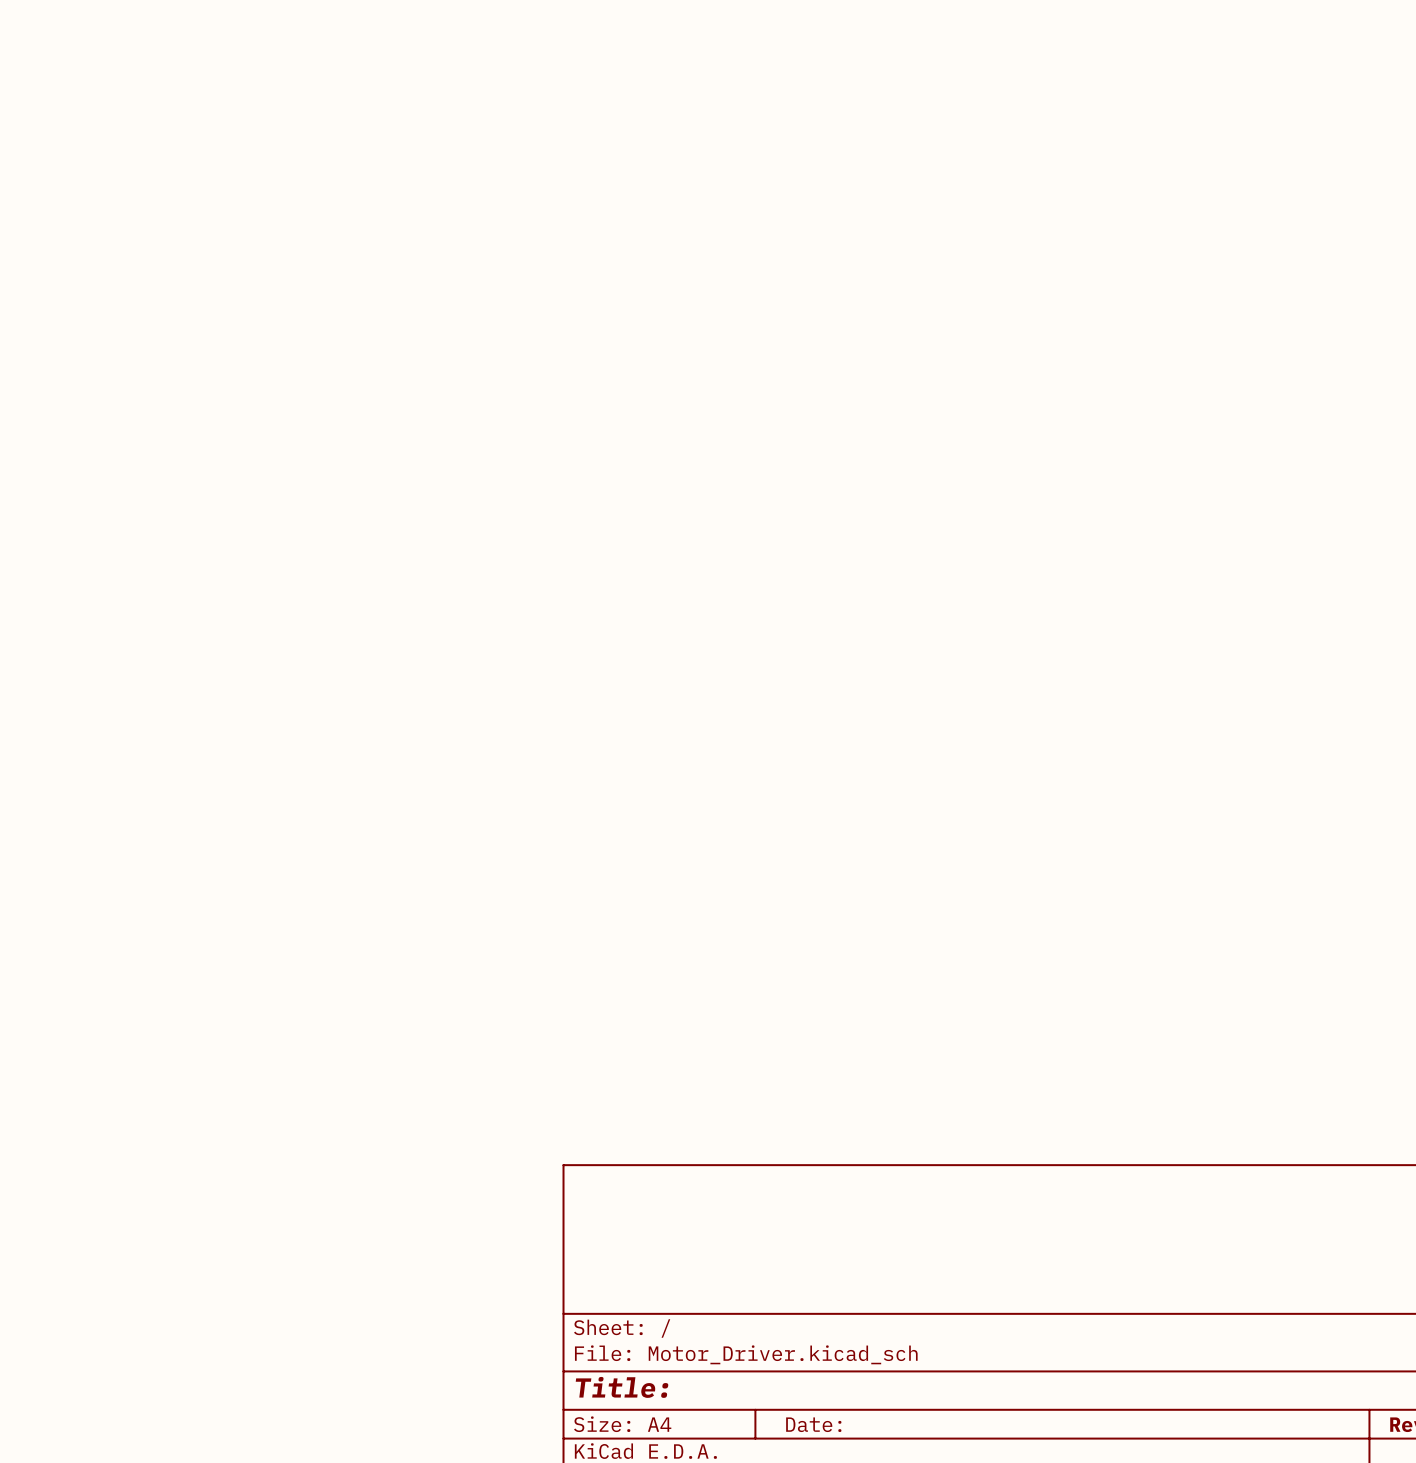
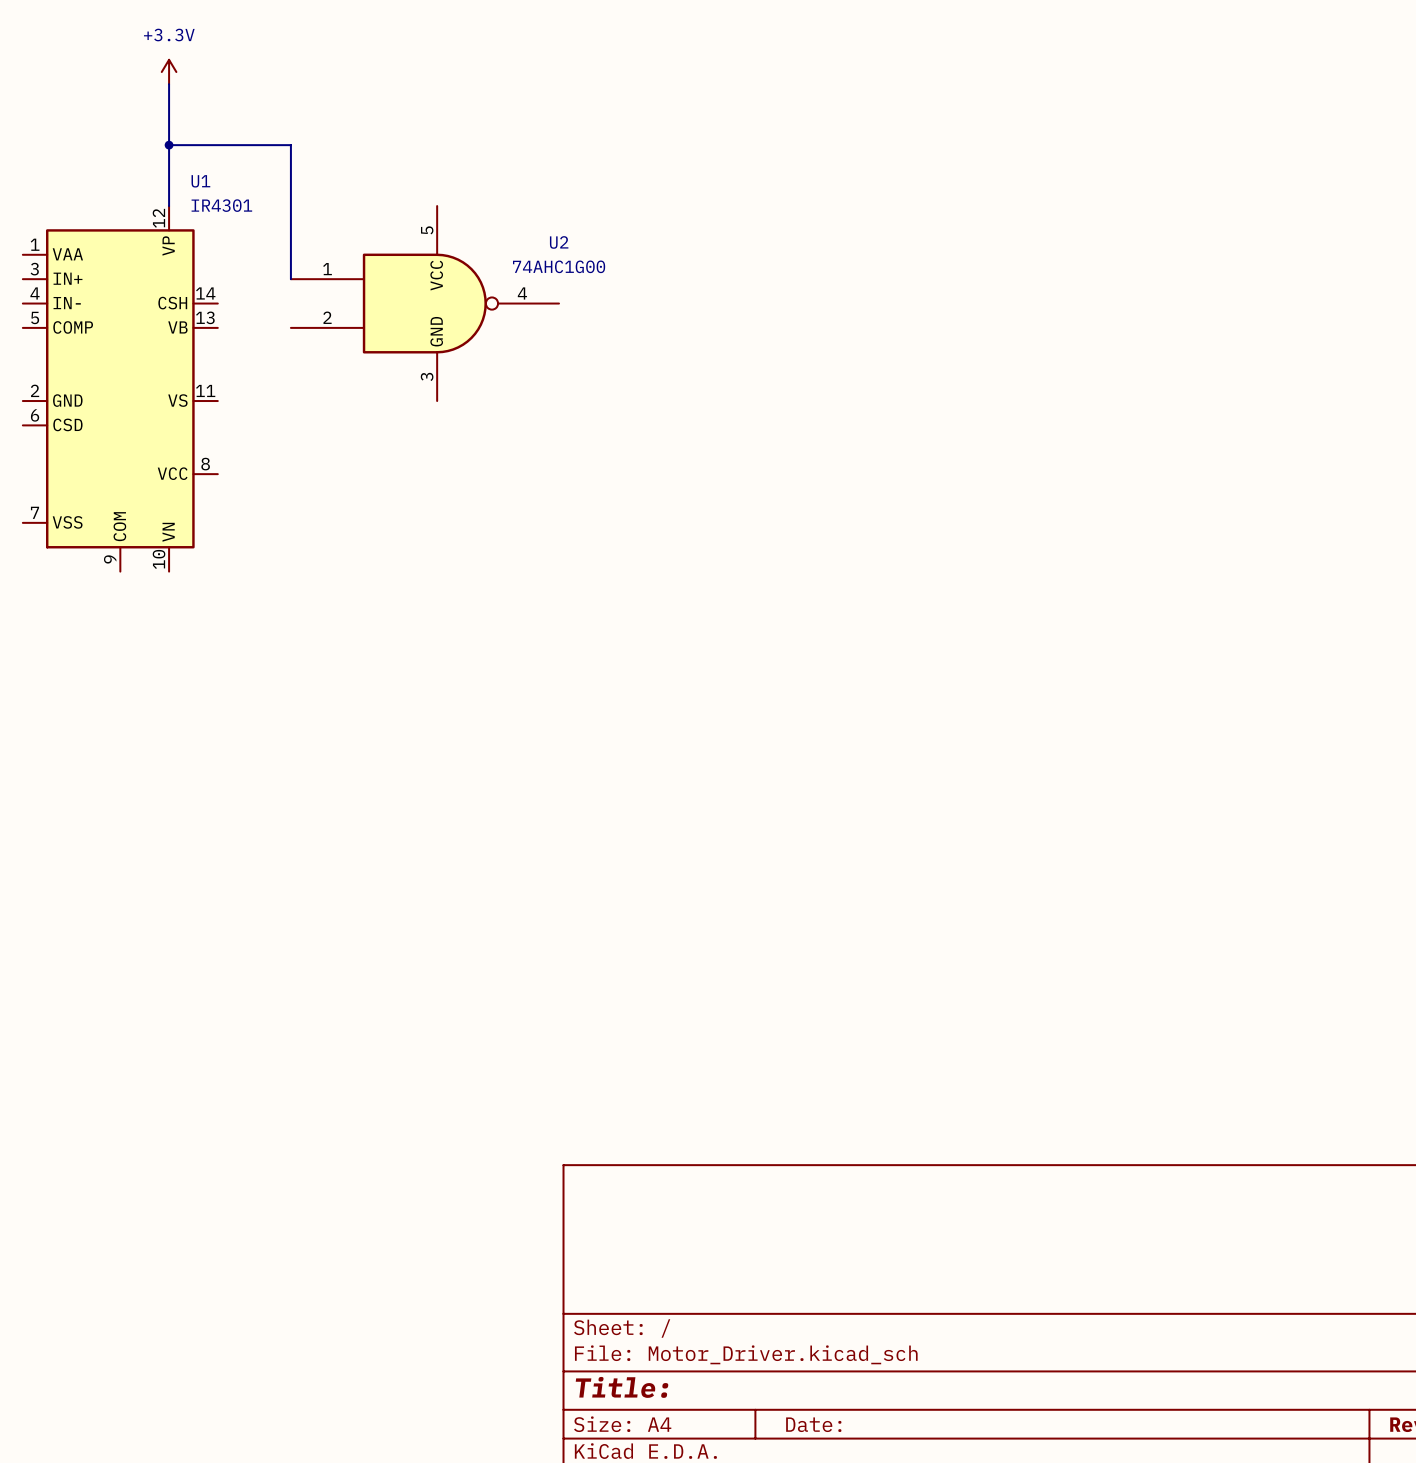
power symbol: none -> +3.3V (169, 72)
wire: none -> (169, 84) (169, 206)
wire: none -> (169, 145) (290, 145) (290, 279)
junction: none -> (169, 145)
U2: none -> 74AHC1G00 (424, 303)
U1: none -> IR4301 (120, 388)

